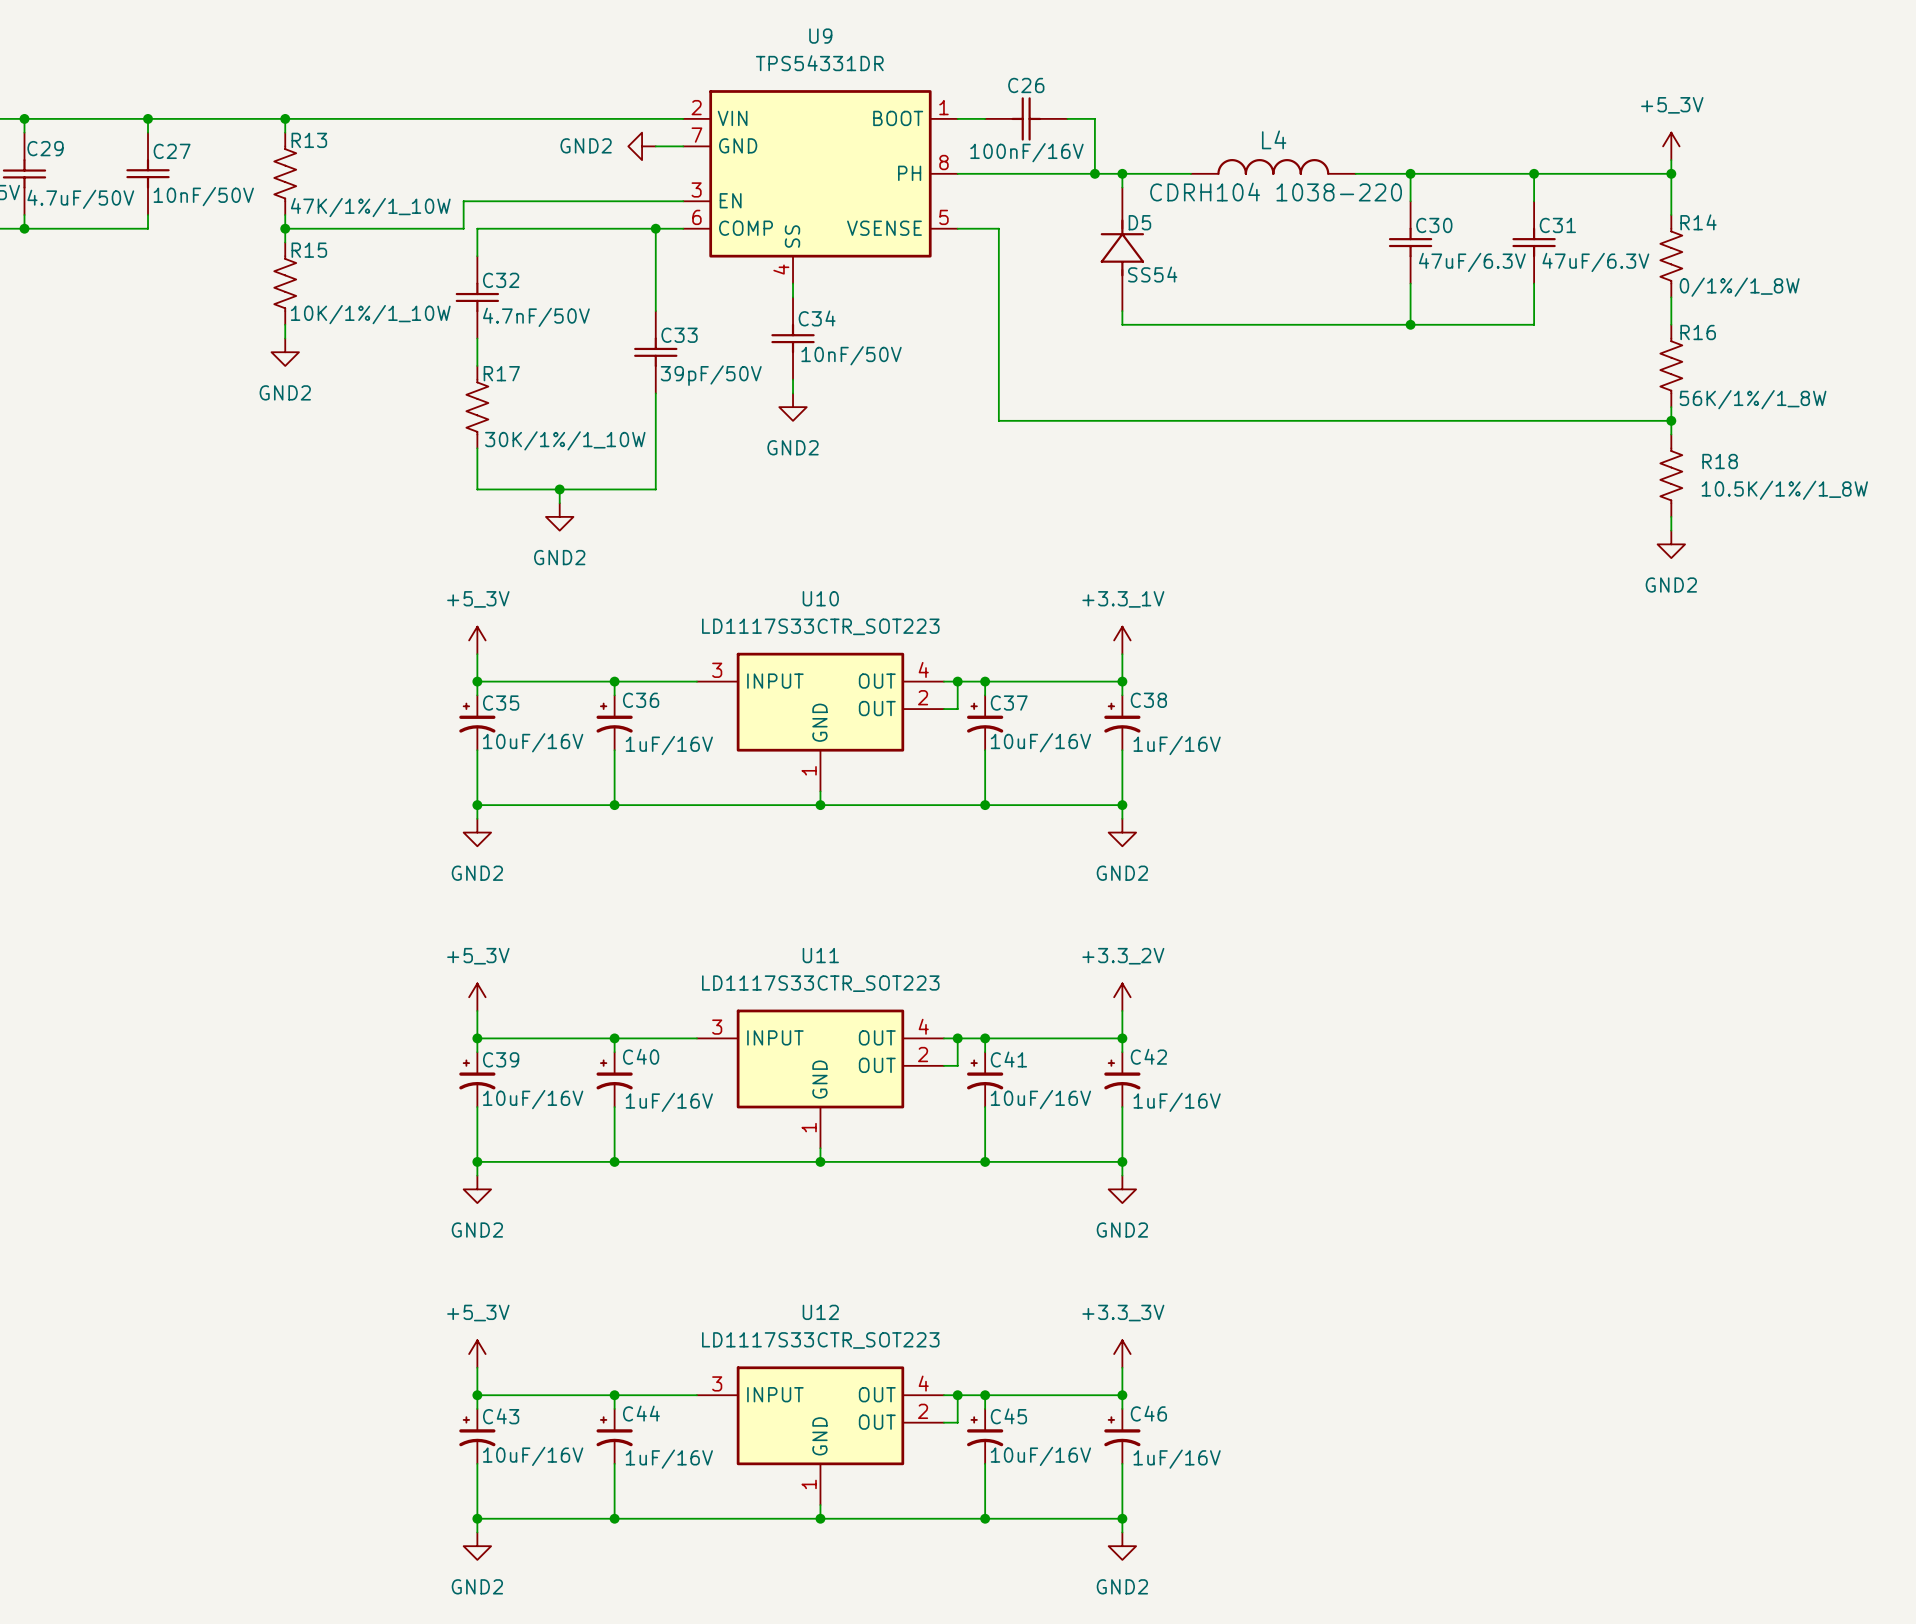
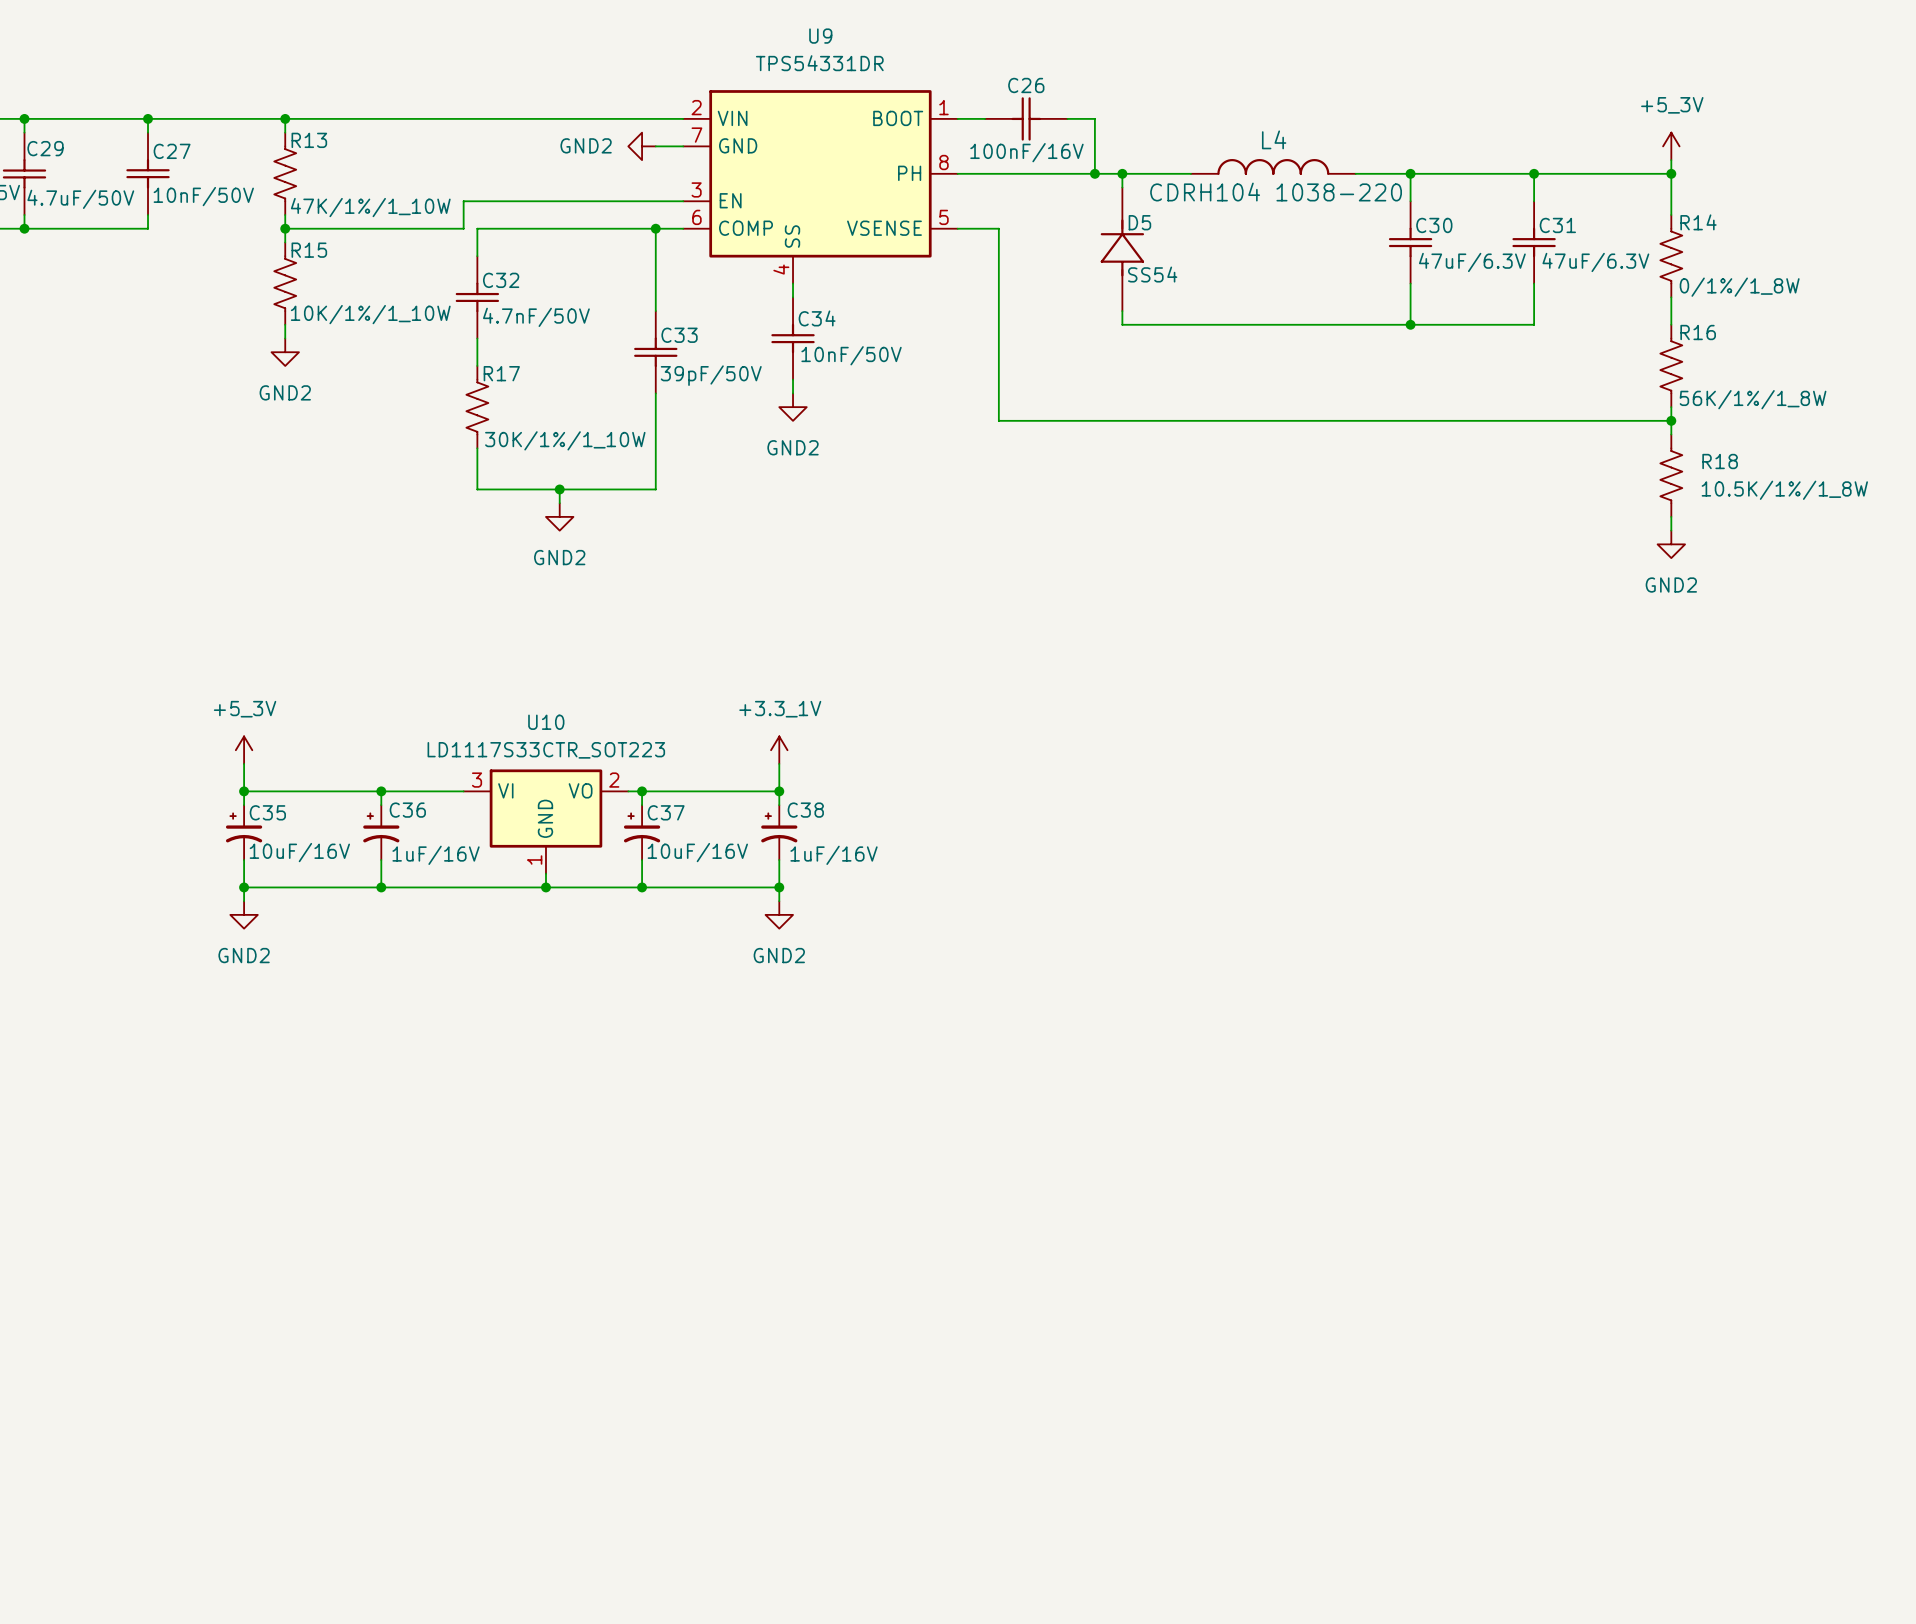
U10 name position: U10 (820, 598) -> U10 (546, 722)
U10 value position: LD1117S33CTR_SOT223 (820, 626) -> LD1117S33CTR_SOT223 (546, 750)
power symbol: +5_3V (477, 640) -> none
power symbol: +3.3_1V (1122, 640) -> none
U10 symbol: [696, 652, 944, 792] -> [463, 769, 629, 874]
wire: (477, 654) (477, 695) -> (244, 763) (244, 805)
wire: (1122, 654) (1122, 695) -> none
wire: (477, 681) (696, 681) -> (244, 791) (463, 791)
junction: (477, 681) -> none
wire: (614, 681) (614, 695) -> (381, 791) (381, 805)
junction: (614, 681) -> none
wire: (943, 681) (1122, 681) -> none
wire: (957, 681) (957, 709) (943, 709) -> none
junction: (957, 681) -> none
wire: (985, 681) (985, 695) -> none
junction: (985, 681) -> none
junction: (1122, 681) -> none
C35 position: (477, 722) -> (244, 832)
C36 position: (614, 722) -> (381, 832)
C37 position: (985, 722) -> (642, 832)
C38 position: (1122, 722) -> (779, 832)
power symbol: none -> +5_3V (244, 750)
wire: (477, 750) (477, 818) -> none
wire: (614, 750) (614, 805) -> none
power symbol: none -> +3.3_1V (779, 750)
wire: (985, 750) (985, 805) -> none
wire: (1122, 750) (1122, 818) -> none
wire: none -> (779, 763) (779, 805)
junction: none -> (244, 791)
junction: none -> (381, 791)
wire: none -> (628, 791) (779, 791)
wire: (820, 791) (820, 805) -> (642, 791) (642, 805)
wire: (477, 805) (1122, 805) -> none
junction: (477, 805) -> none
junction position: (614, 805) -> (642, 791)
junction position: (820, 805) -> (779, 791)
junction: (985, 805) -> none
junction: (1122, 805) -> none
power symbol: GND2 (477, 832) -> none
power symbol: GND2 (1122, 832) -> none
wire: none -> (244, 860) (244, 901)
wire: none -> (381, 860) (381, 887)
wire: none -> (642, 860) (642, 887)
wire: none -> (779, 860) (779, 901)
wire: none -> (244, 887) (779, 887)
junction: none -> (244, 887)
junction: none -> (381, 887)
junction: none -> (545, 887)
junction: none -> (642, 887)
junction: none -> (779, 887)
power symbol: none -> GND2 (244, 914)
power symbol: none -> GND2 (779, 914)
power symbol: +5_3V (477, 997) -> none
power symbol: +3.3_2V (1122, 997) -> none
wire: (477, 1010) (477, 1052) -> none
wire: (1122, 1010) (1122, 1052) -> none
wire: (477, 1038) (696, 1038) -> none
junction: (477, 1038) -> none
wire: (614, 1038) (614, 1052) -> (545, 873) (545, 887)
junction: (614, 1038) -> none
wire: (943, 1038) (1122, 1038) -> none
wire: (957, 1038) (957, 1065) (943, 1065) -> none
junction: (957, 1038) -> none
wire: (985, 1038) (985, 1052) -> none
junction: (985, 1038) -> none
junction: (1122, 1038) -> none
U11: LD1117S33CTR_SOT223 (820, 1078) -> none
C39: 10uF/16V (477, 1079) -> none
C40: 1uF/16V (614, 1079) -> none
C41: 10uF/16V (985, 1079) -> none
C42: 1uF/16V (1122, 1079) -> none
wire: (477, 1107) (477, 1175) -> none
wire: (614, 1107) (614, 1161) -> none
wire: (985, 1107) (985, 1161) -> none
wire: (1122, 1107) (1122, 1175) -> none
wire: (820, 1148) (820, 1161) -> none
wire: (477, 1161) (1122, 1161) -> none
junction: (477, 1161) -> none
junction: (614, 1161) -> none
junction: (820, 1161) -> none
junction: (985, 1161) -> none
junction: (1122, 1161) -> none
power symbol: GND2 (477, 1189) -> none
power symbol: GND2 (1122, 1189) -> none
power symbol: +5_3V (477, 1354) -> none
power symbol: +3.3_3V (1122, 1354) -> none
wire: (477, 1367) (477, 1408) -> none
wire: (1122, 1367) (1122, 1408) -> none
wire: (477, 1395) (696, 1395) -> none
junction: (477, 1395) -> none
wire: (614, 1395) (614, 1408) -> none
junction: (614, 1395) -> none
wire: (943, 1395) (1122, 1395) -> none
wire: (957, 1395) (957, 1422) (943, 1422) -> none
junction: (957, 1395) -> none
wire: (985, 1395) (985, 1408) -> none
junction: (985, 1395) -> none
junction: (1122, 1395) -> none
U12: LD1117S33CTR_SOT223 (820, 1435) -> none
C43: 10uF/16V (477, 1436) -> none
C44: 1uF/16V (614, 1436) -> none
C45: 10uF/16V (985, 1436) -> none
C46: 1uF/16V (1122, 1436) -> none
wire: (477, 1463) (477, 1532) -> none
wire: (614, 1463) (614, 1518) -> none
wire: (985, 1463) (985, 1518) -> none
wire: (1122, 1463) (1122, 1532) -> none
wire: (820, 1505) (820, 1518) -> none
wire: (477, 1518) (1122, 1518) -> none
junction: (477, 1518) -> none
junction: (614, 1518) -> none
junction: (820, 1518) -> none
junction: (985, 1518) -> none
junction: (1122, 1518) -> none
power symbol: GND2 (477, 1546) -> none
power symbol: GND2 (1122, 1546) -> none

